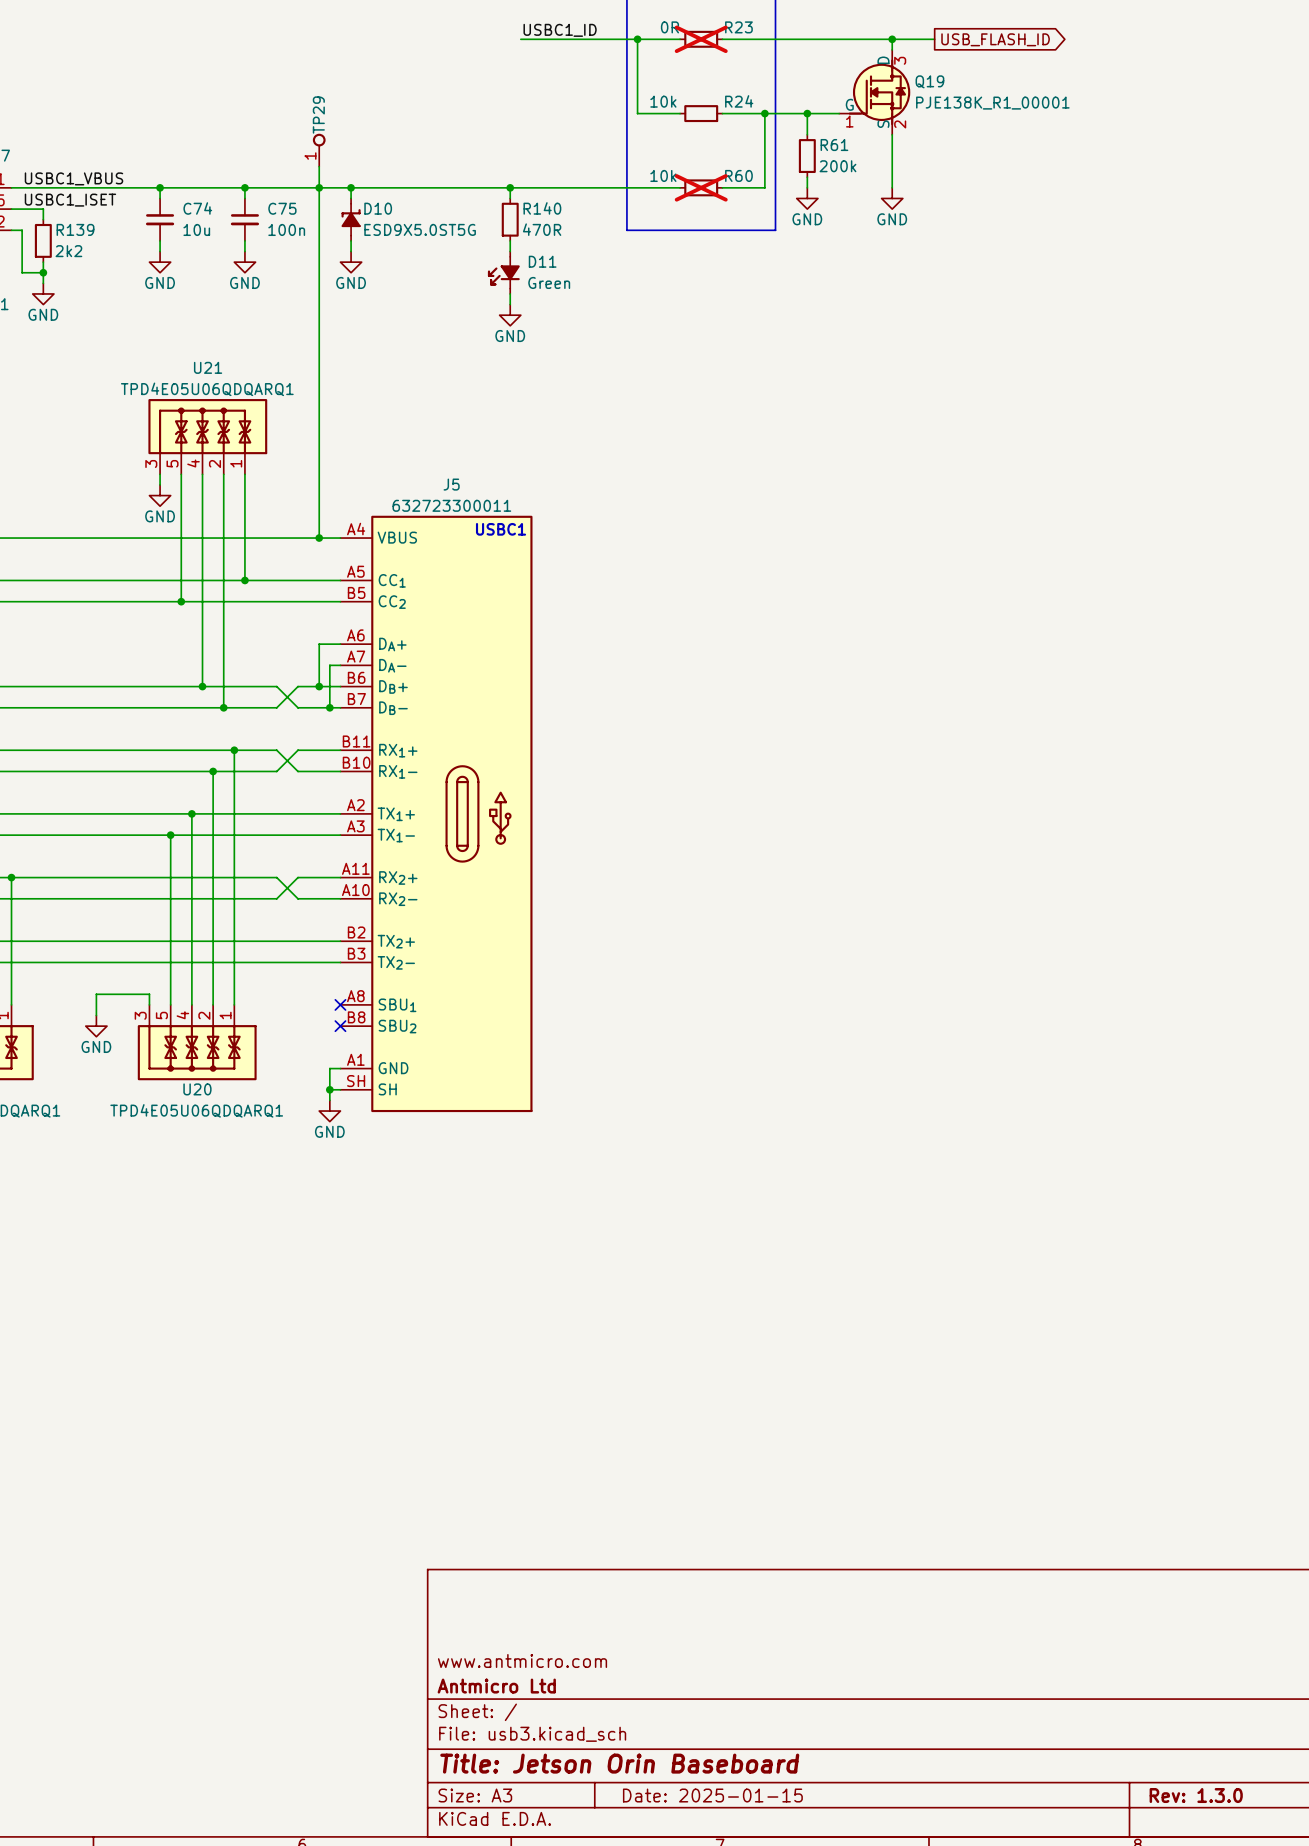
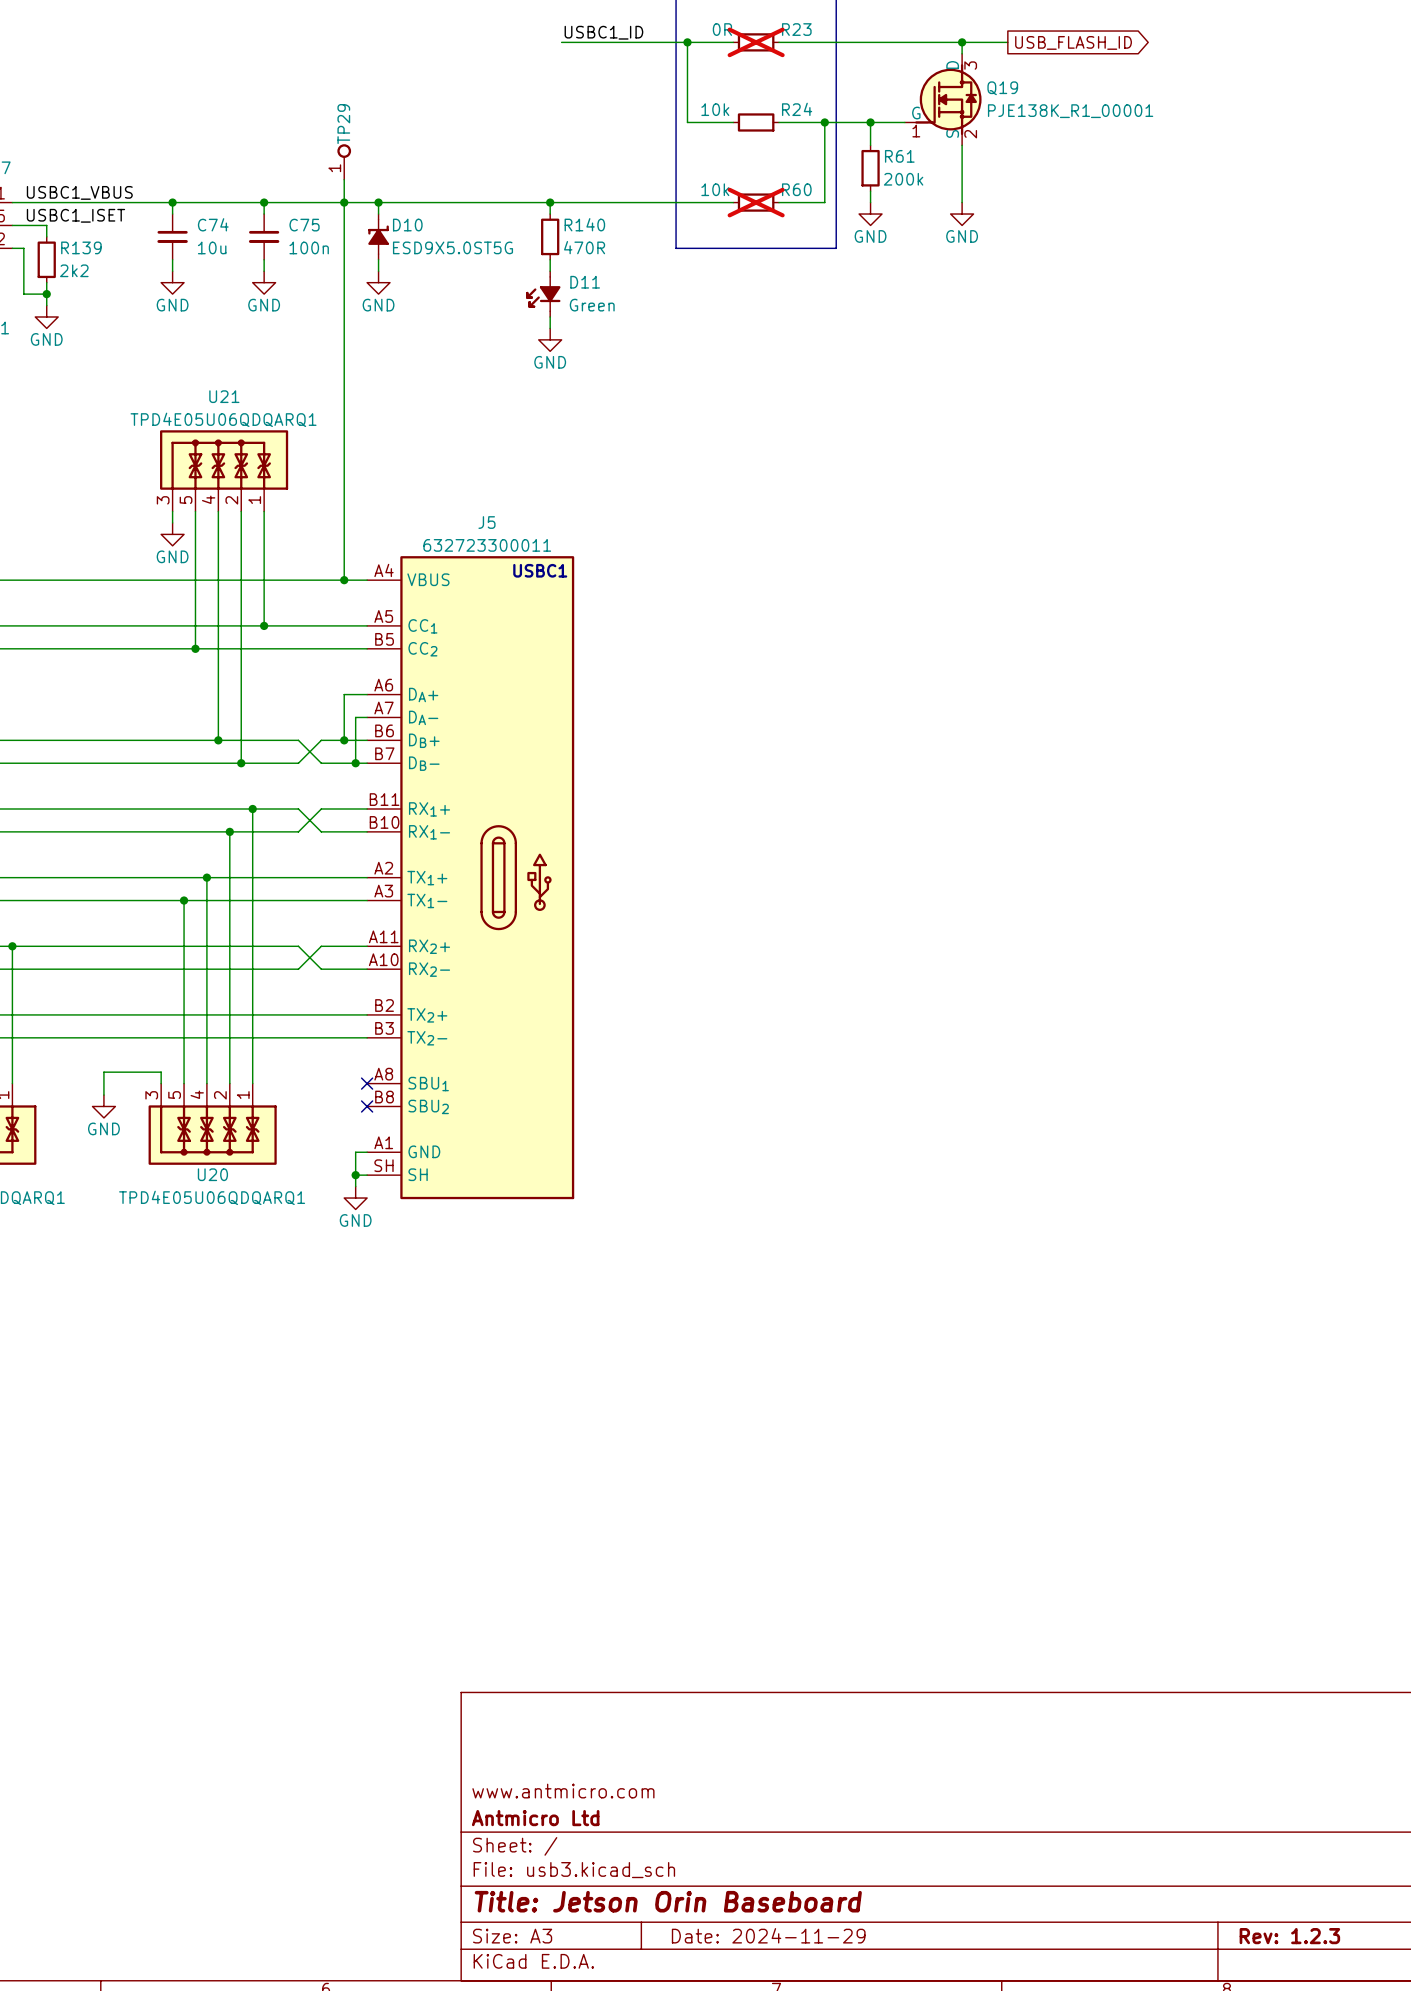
title block: Date: 2025-01-15 (712, 1795) -> Date: 2024-11-29 (768, 1935)
title block: Rev: 1.3.0 (1196, 1795) -> Rev: 1.2.3 (1289, 1936)

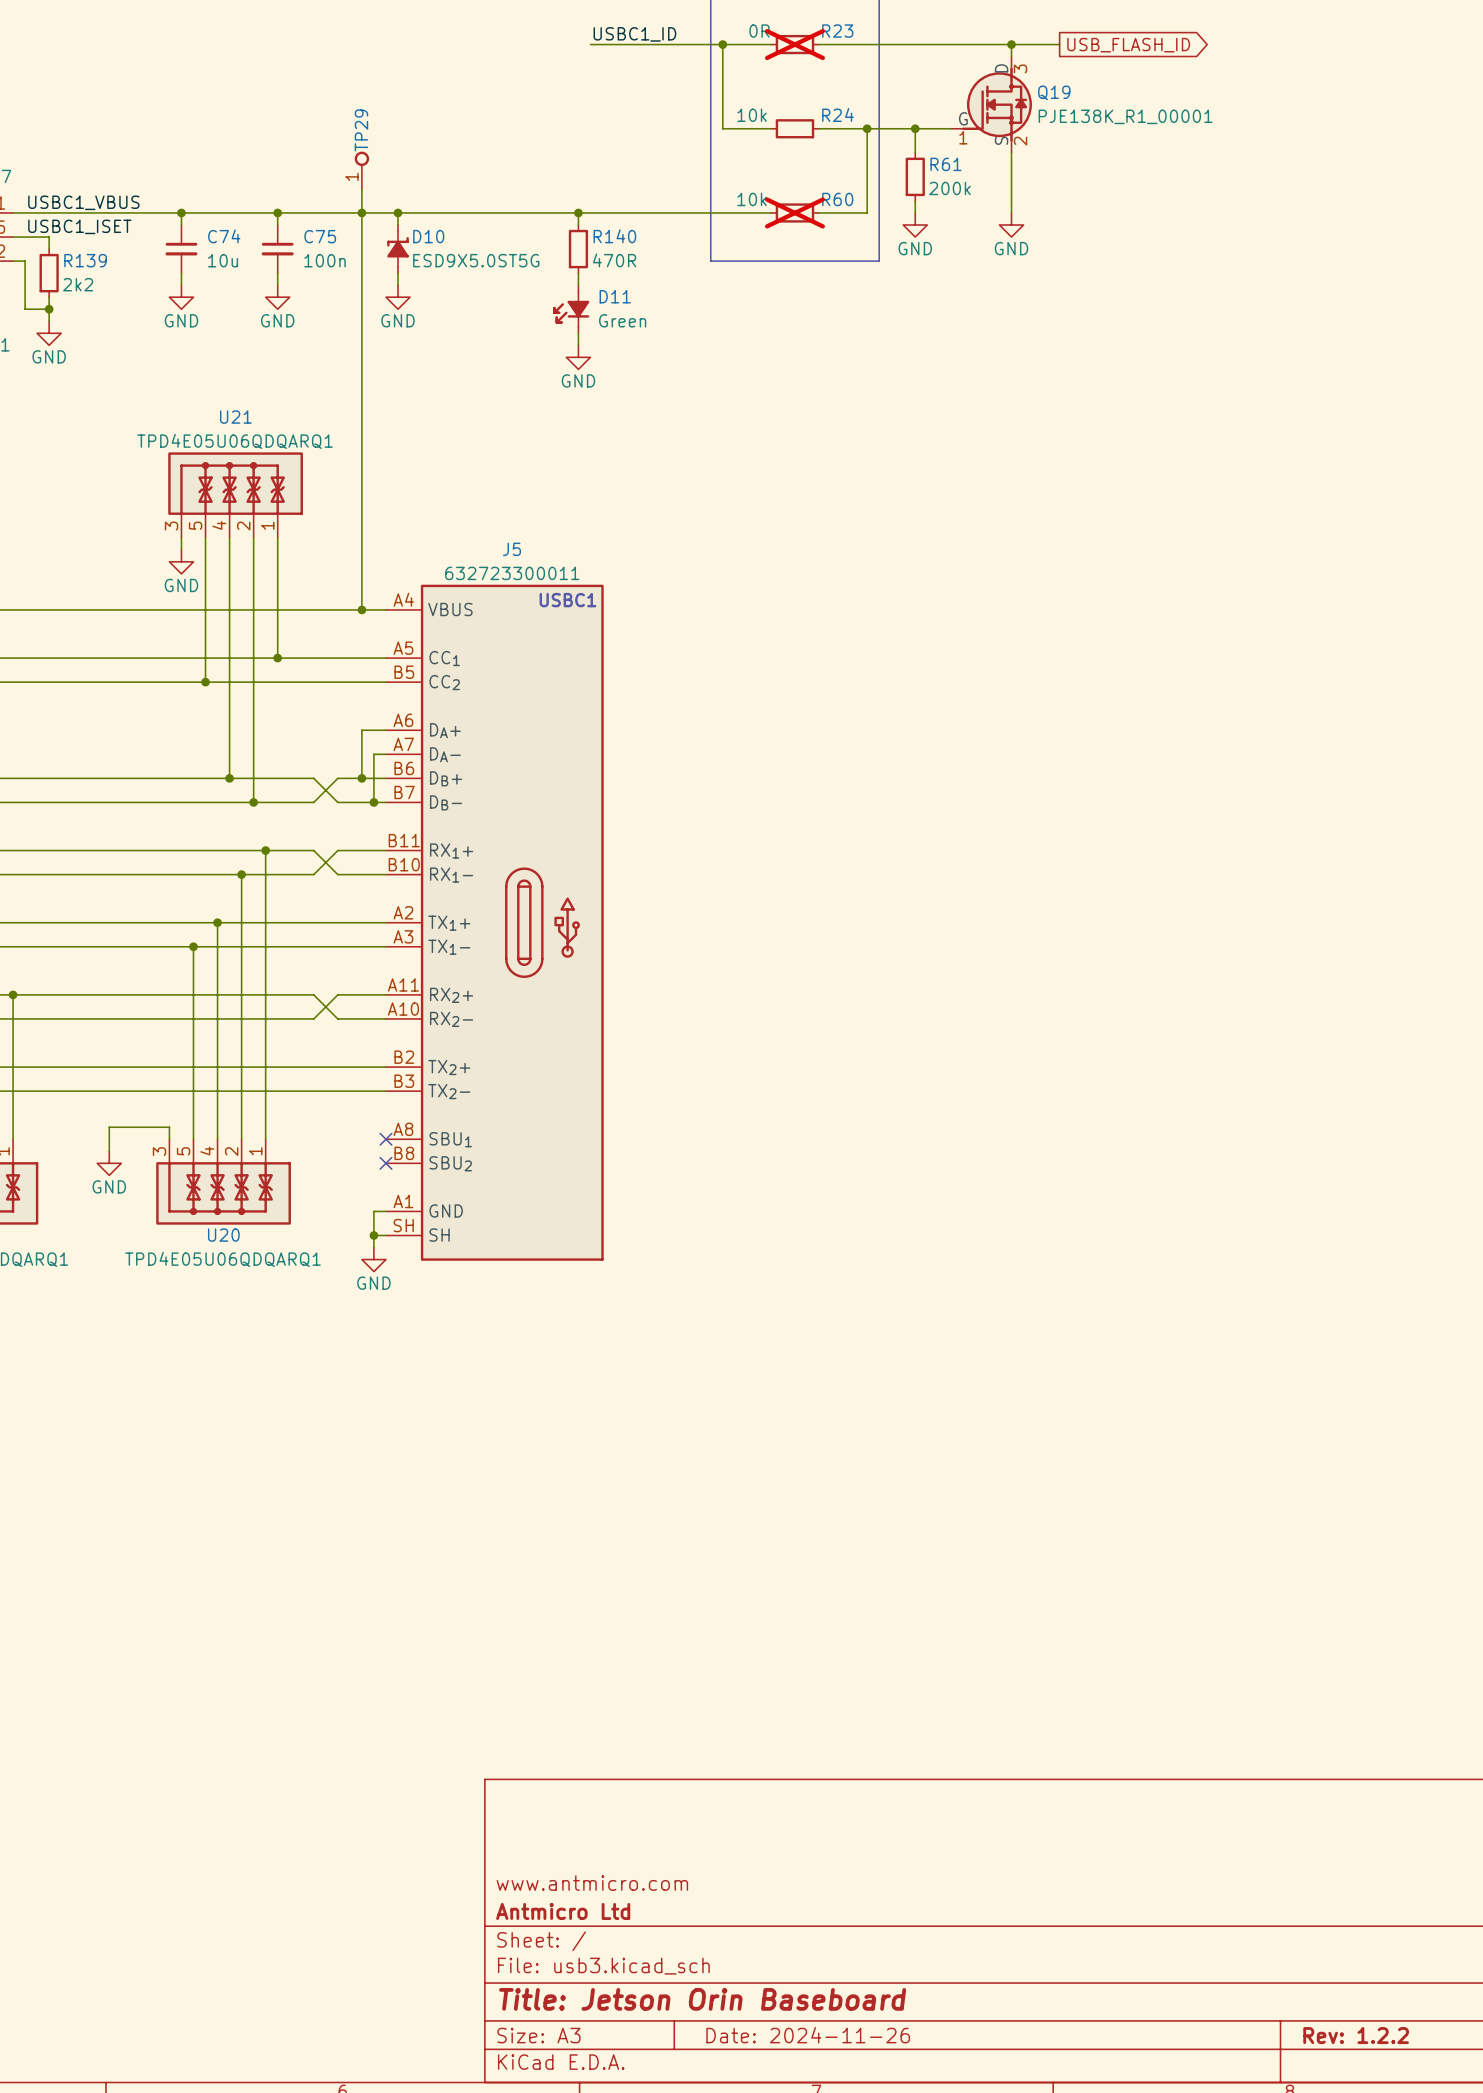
title block: Date: 2024-11-29 (768, 1935) -> Date: 2024-11-26 (808, 2035)
title block: Rev: 1.2.3 (1289, 1936) -> Rev: 1.2.2 (1356, 2035)

